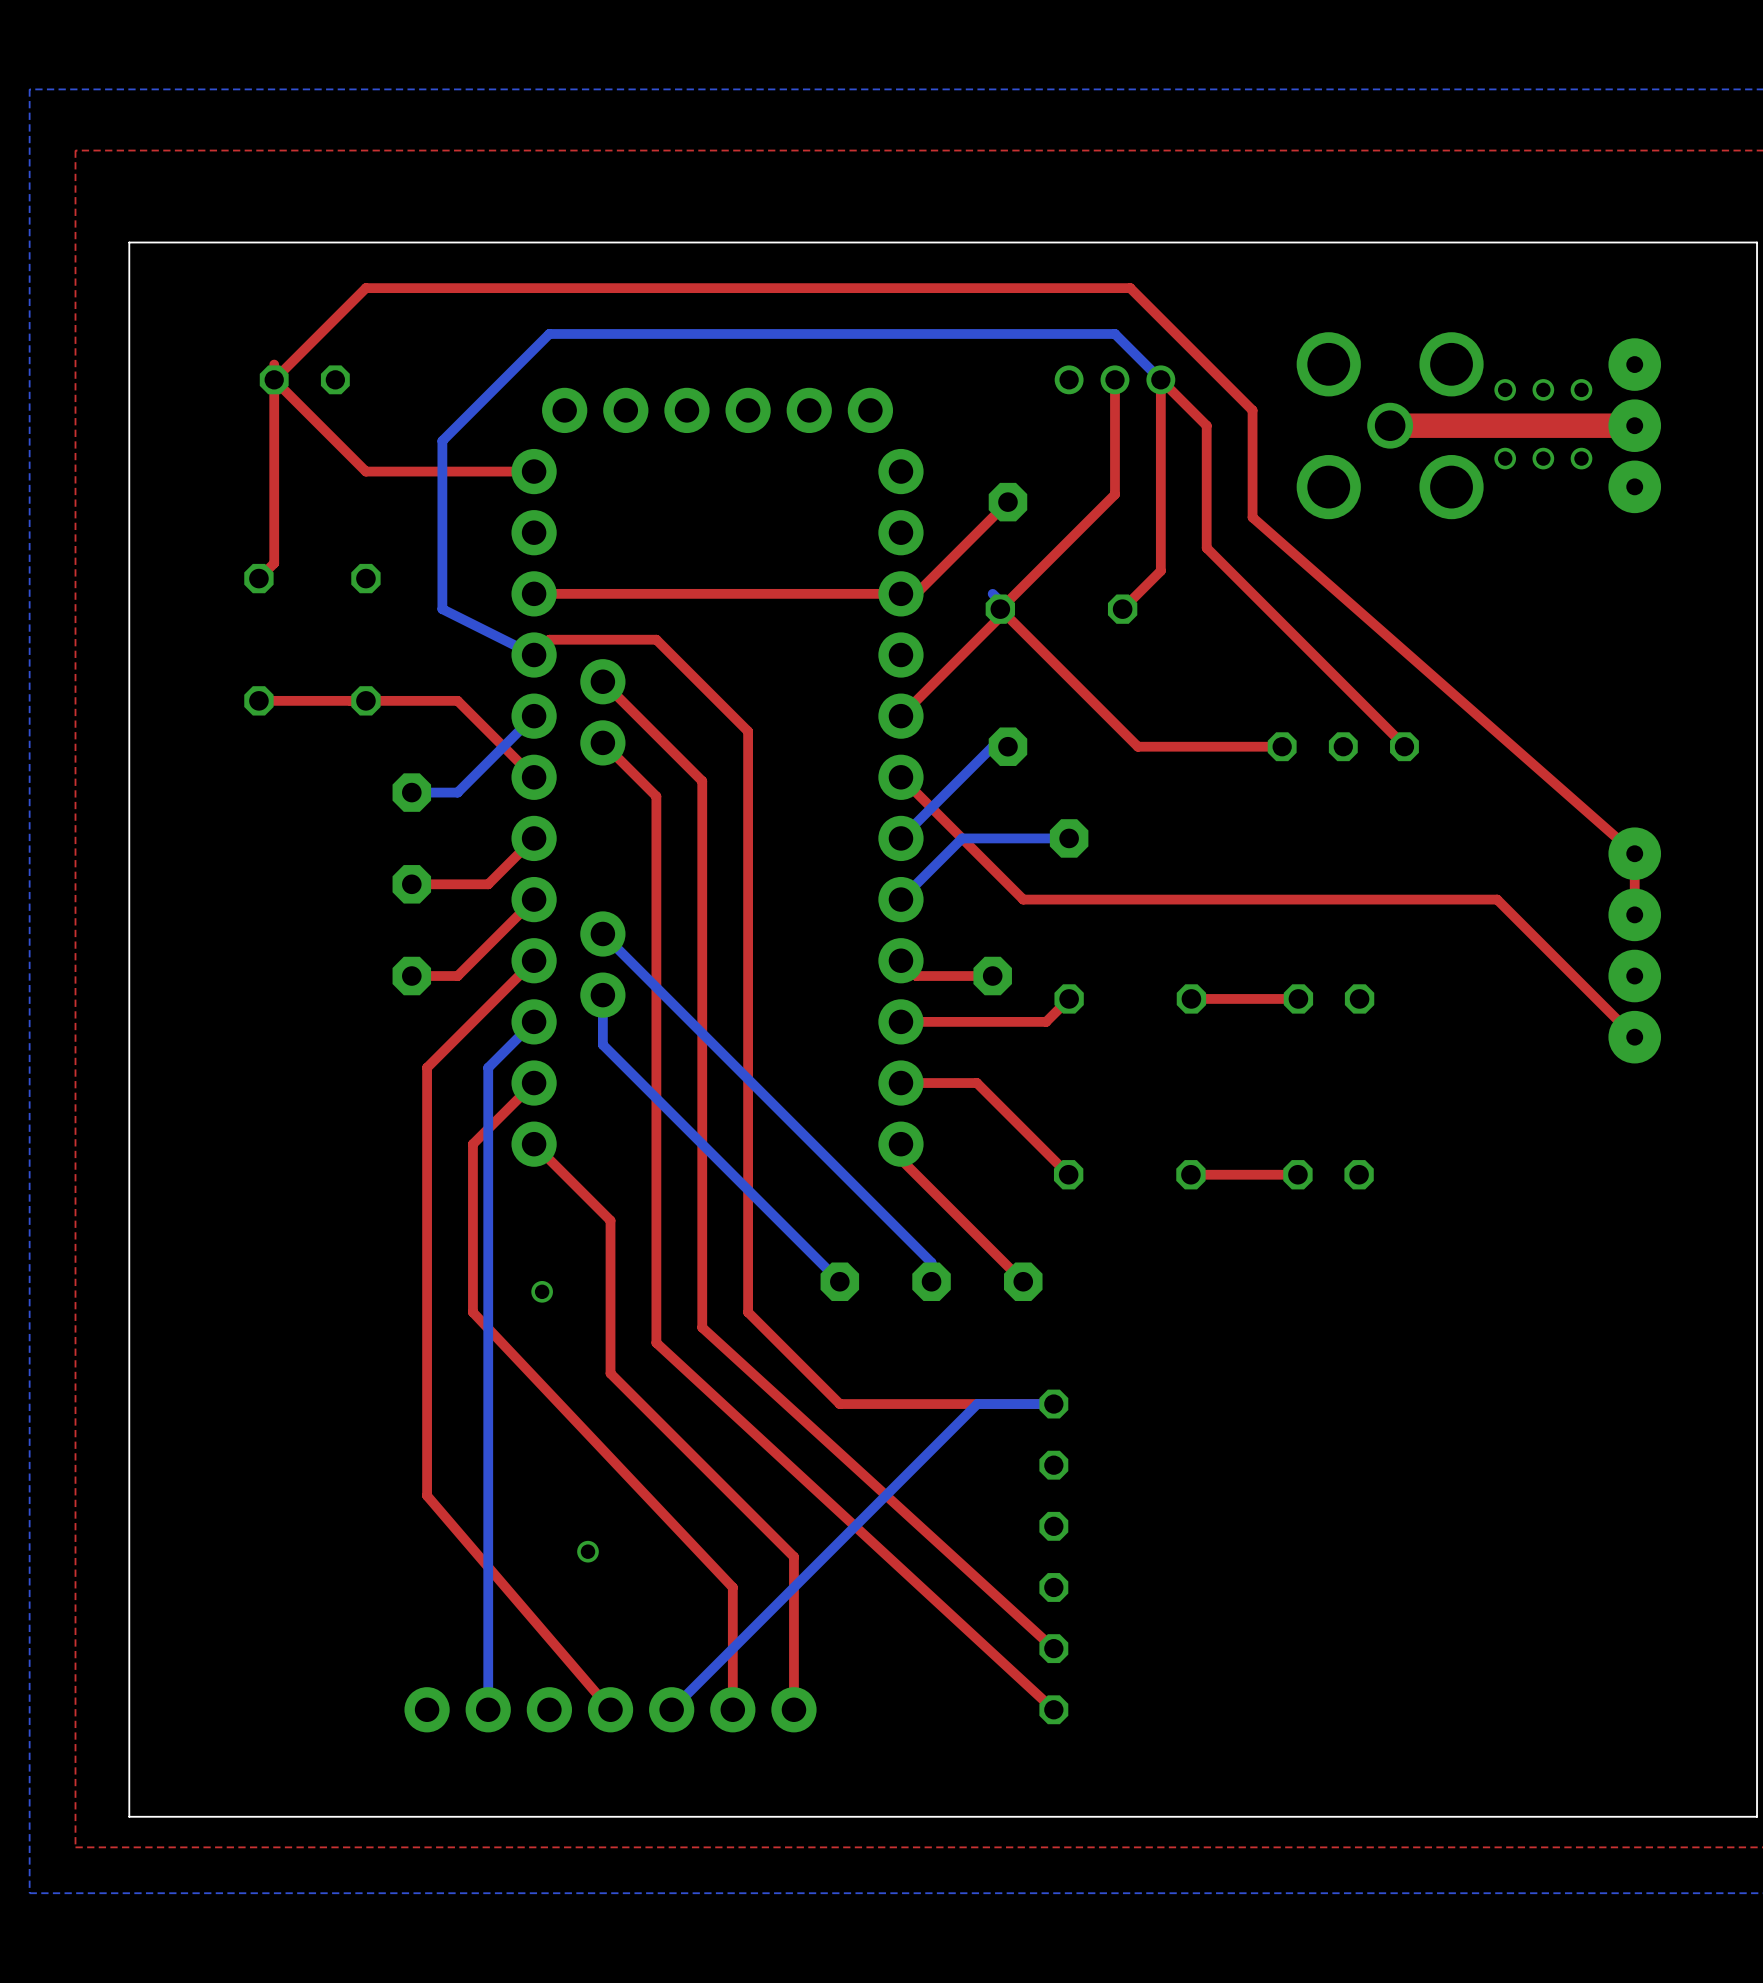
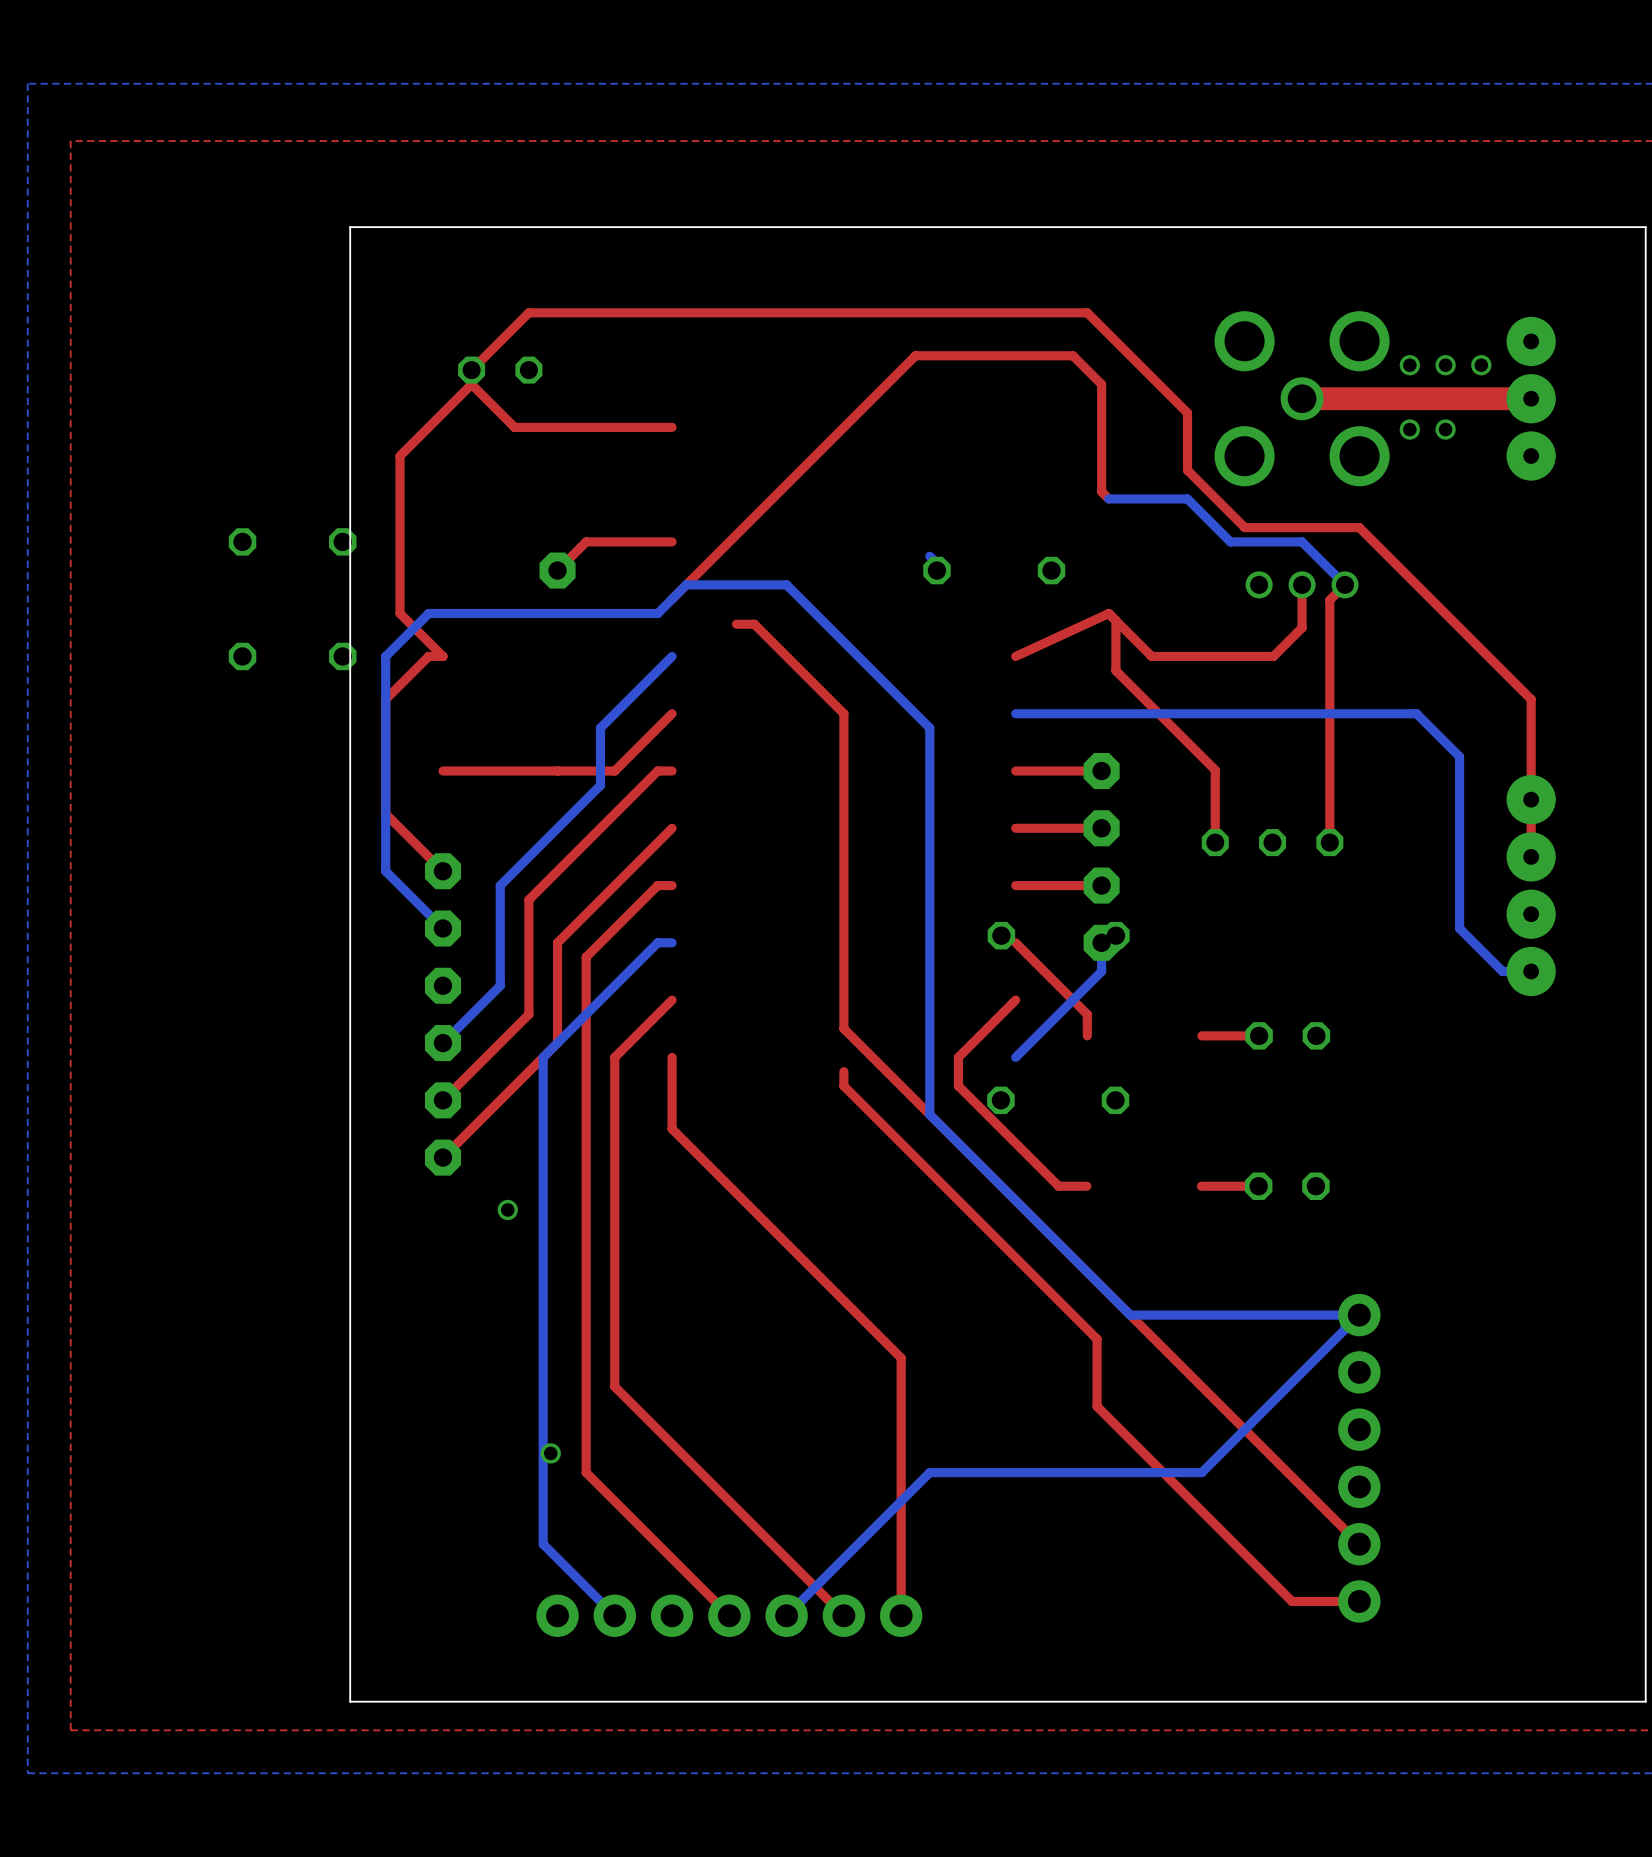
board edge: (373, 242) (129, 242) (129, 1816) (373, 1816) -> (350, 227) (350, 1701)
top track: (274, 364) (274, 563) (258, 578) -> none
part position: (304, 379) -> (500, 370)
top track: (1114, 379) (1114, 494) (1000, 609) -> none
part position: (1114, 379) -> (1302, 584)
bottom track: (1160, 379) (1114, 333) (549, 333) (442, 440) (442, 609) (534, 655) -> none
top track: none -> (471, 384) (400, 456) (400, 613) (442, 656) (428, 656) (385, 699) (385, 813) (442, 871)
top track: none -> (471, 384) (514, 427) (672, 427)
via: (1581, 458) -> none
top track: (534, 471) (365, 471) (274, 379) (365, 288) (1130, 288) (1252, 410) (1252, 517) (1634, 853) -> (471, 384) (471, 370) (528, 312) (1087, 312) (1187, 413) (1187, 470) (1244, 527) (1359, 527) (1531, 699) (1531, 799)
top track: (1007, 502) (916, 593) (534, 593) -> none
part: (1007, 502) -> none
bottom track: none -> (1108, 498) (1187, 498) (1230, 541) (1302, 541) (1345, 584)
top track: none -> (1108, 498) (1101, 491) (1101, 384) (1072, 355) (915, 355) (672, 599)
top track: none -> (672, 541) (586, 541) (557, 570)
part: none -> (557, 570)
top track: (1000, 609) (1137, 746) (1282, 746) -> none
top track: (1000, 609) (1000, 616) (900, 716) -> none
top track: (1122, 609) (1160, 570) (1160, 379) (1206, 425) (1206, 547) (1404, 746) -> none
top track: none -> (1302, 584) (1302, 627) (1273, 656) (1151, 656) (1108, 613) (1015, 656)
top track: none -> (1345, 584) (1329, 600) (1329, 842)
top track: (534, 655) (549, 639) (656, 639) (748, 731) (748, 1312) (839, 1404) (1053, 1404) -> none
top track: none -> (1115, 620) (1115, 670) (1215, 770) (1215, 842)
top track: none -> (736, 624) (754, 624) (843, 713) (843, 1028) (1359, 1544)
top track: (602, 681) (702, 781) (702, 1327) (1053, 1648) -> none
top track: (258, 700) (457, 700) (534, 777) -> none
bottom track: none -> (672, 656) (600, 728) (600, 785) (500, 885) (500, 985) (442, 1043)
bottom track: (534, 716) (457, 792) (411, 792) -> none
top track: (602, 742) (656, 796) (656, 1128) -> (672, 1000) (614, 1057)
bottom track: (1007, 746) (992, 746) (900, 838) -> none
part: (1007, 746) -> none
part position: (1343, 746) -> (1272, 842)
top track: none -> (672, 713) (614, 771) (442, 771)
bottom track: none -> (1015, 713) (1416, 713) (1459, 756) (1459, 928) (1502, 971) (1531, 971)
part: (717, 777) -> none
top track: (900, 777) (1023, 899) (1497, 899) (1634, 1037) -> none
part: (411, 792) -> none
top track: none -> (672, 771) (657, 771) (528, 899) (528, 1014) (442, 1100)
top track: none -> (1101, 771) (1015, 771)
part: none -> (1101, 771)
top track: (534, 838) (488, 884) (411, 884) -> none
bottom track: (1069, 838) (962, 838) (900, 899) -> none
part: (1069, 838) -> none
part: (411, 884) -> none
top track: none -> (672, 828) (557, 942) (557, 1043) (442, 1157)
top track: none -> (1101, 828) (1015, 828)
part: none -> (1101, 828)
top track: (534, 899) (457, 976) (411, 976) -> none
part: none -> (442, 871)
bottom track: (602, 933) (931, 1262) (931, 1281) -> none
top track: none -> (672, 885) (657, 885) (586, 957) (586, 1472) (729, 1615)
top track: none -> (1101, 885) (1015, 885)
part: none -> (1101, 885)
top track: (534, 960) (427, 1067) (427, 1495) (610, 1709) -> none
top track: (900, 960) (916, 976) (992, 976) -> none
part: (411, 976) -> none
part: (992, 976) -> none
bottom track: none -> (442, 928) (385, 871) (385, 656) (428, 613) (657, 613) (686, 584) (786, 584) (929, 728) (929, 1114) (1130, 1315) (1359, 1315)
part: none -> (442, 928)
bottom track: (602, 995) (602, 1044) (839, 1281) -> none
top track: (1069, 998) (1046, 1021) (900, 1021) -> none
top track: (1298, 998) (1191, 998) -> none
part: (1329, 998) -> none
bottom track: none -> (672, 942) (657, 942) (543, 1057) (543, 1544) (614, 1615)
top track: none -> (1015, 942) (1087, 1014) (1087, 1035)
bottom track: none -> (1101, 942) (1101, 971) (1015, 1057)
part: none -> (1101, 942)
bottom track: (534, 1021) (488, 1067) (488, 1709) -> none
part: none -> (442, 985)
top track: none -> (1015, 1000) (958, 1057) (958, 1086) (1058, 1186) (1086, 1186)
top track: (534, 1083) (472, 1144) (472, 1312) (732, 1587) (732, 1709) -> none
top track: (900, 1083) (976, 1083) (1068, 1174) -> none
top track: none -> (1259, 1035) (1201, 1035)
part: none -> (1287, 1035)
part: none -> (442, 1043)
top track: none -> (672, 1057) (672, 1128) (901, 1358) (901, 1615)
top track: (534, 1144) (610, 1220) (610, 1373) (793, 1556) (793, 1709) -> none
part: none -> (442, 1100)
top track: (1297, 1174) (1190, 1174) -> none
part: (1328, 1174) -> none
part: none -> (442, 1157)
top track: none -> (1258, 1186) (1201, 1186)
part: none -> (1287, 1186)
part: (839, 1281) -> none
part: (931, 1281) -> none
top track: none -> (958, 1200) (1097, 1339) (1097, 1406) (1292, 1601) (1359, 1601)
part: (1023, 1281) -> none
top track: (656, 1342) (1053, 1709) -> (614, 1257) (614, 1386) (843, 1615)
bottom track: (1053, 1404) (977, 1404) (671, 1709) -> none
bottom track: none -> (1345, 1315) (1345, 1329) (1201, 1472) (929, 1472) (786, 1615)
part: (1053, 1556) -> none
part: none -> (1359, 1458)
part position: (610, 1709) -> (729, 1615)

